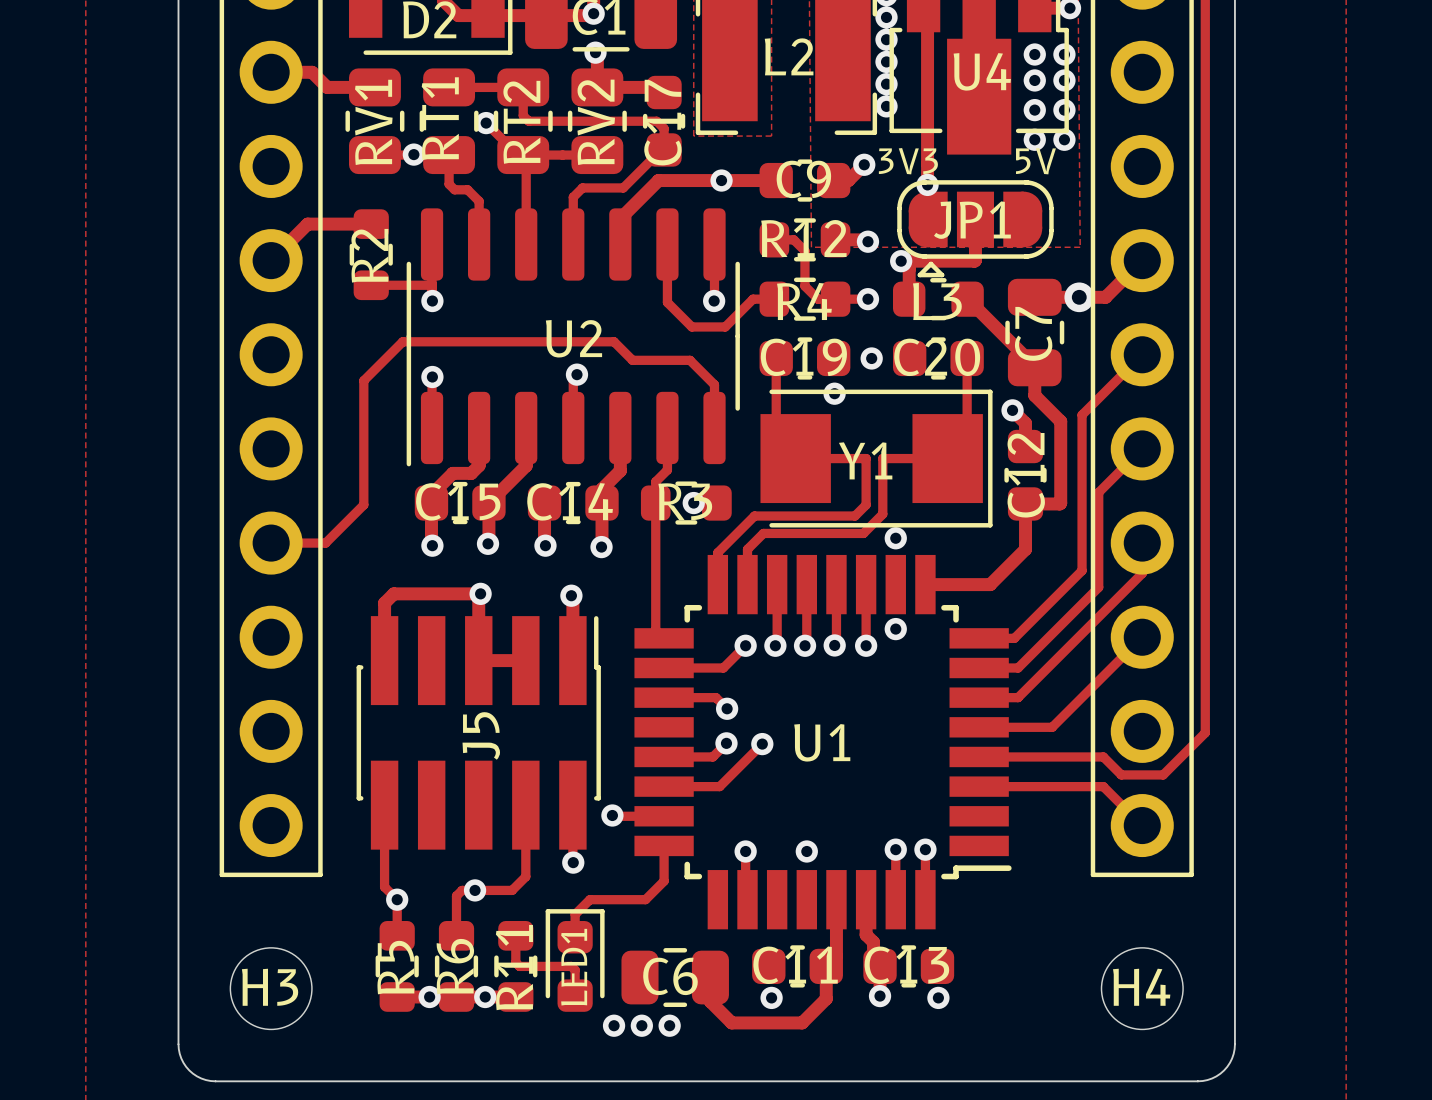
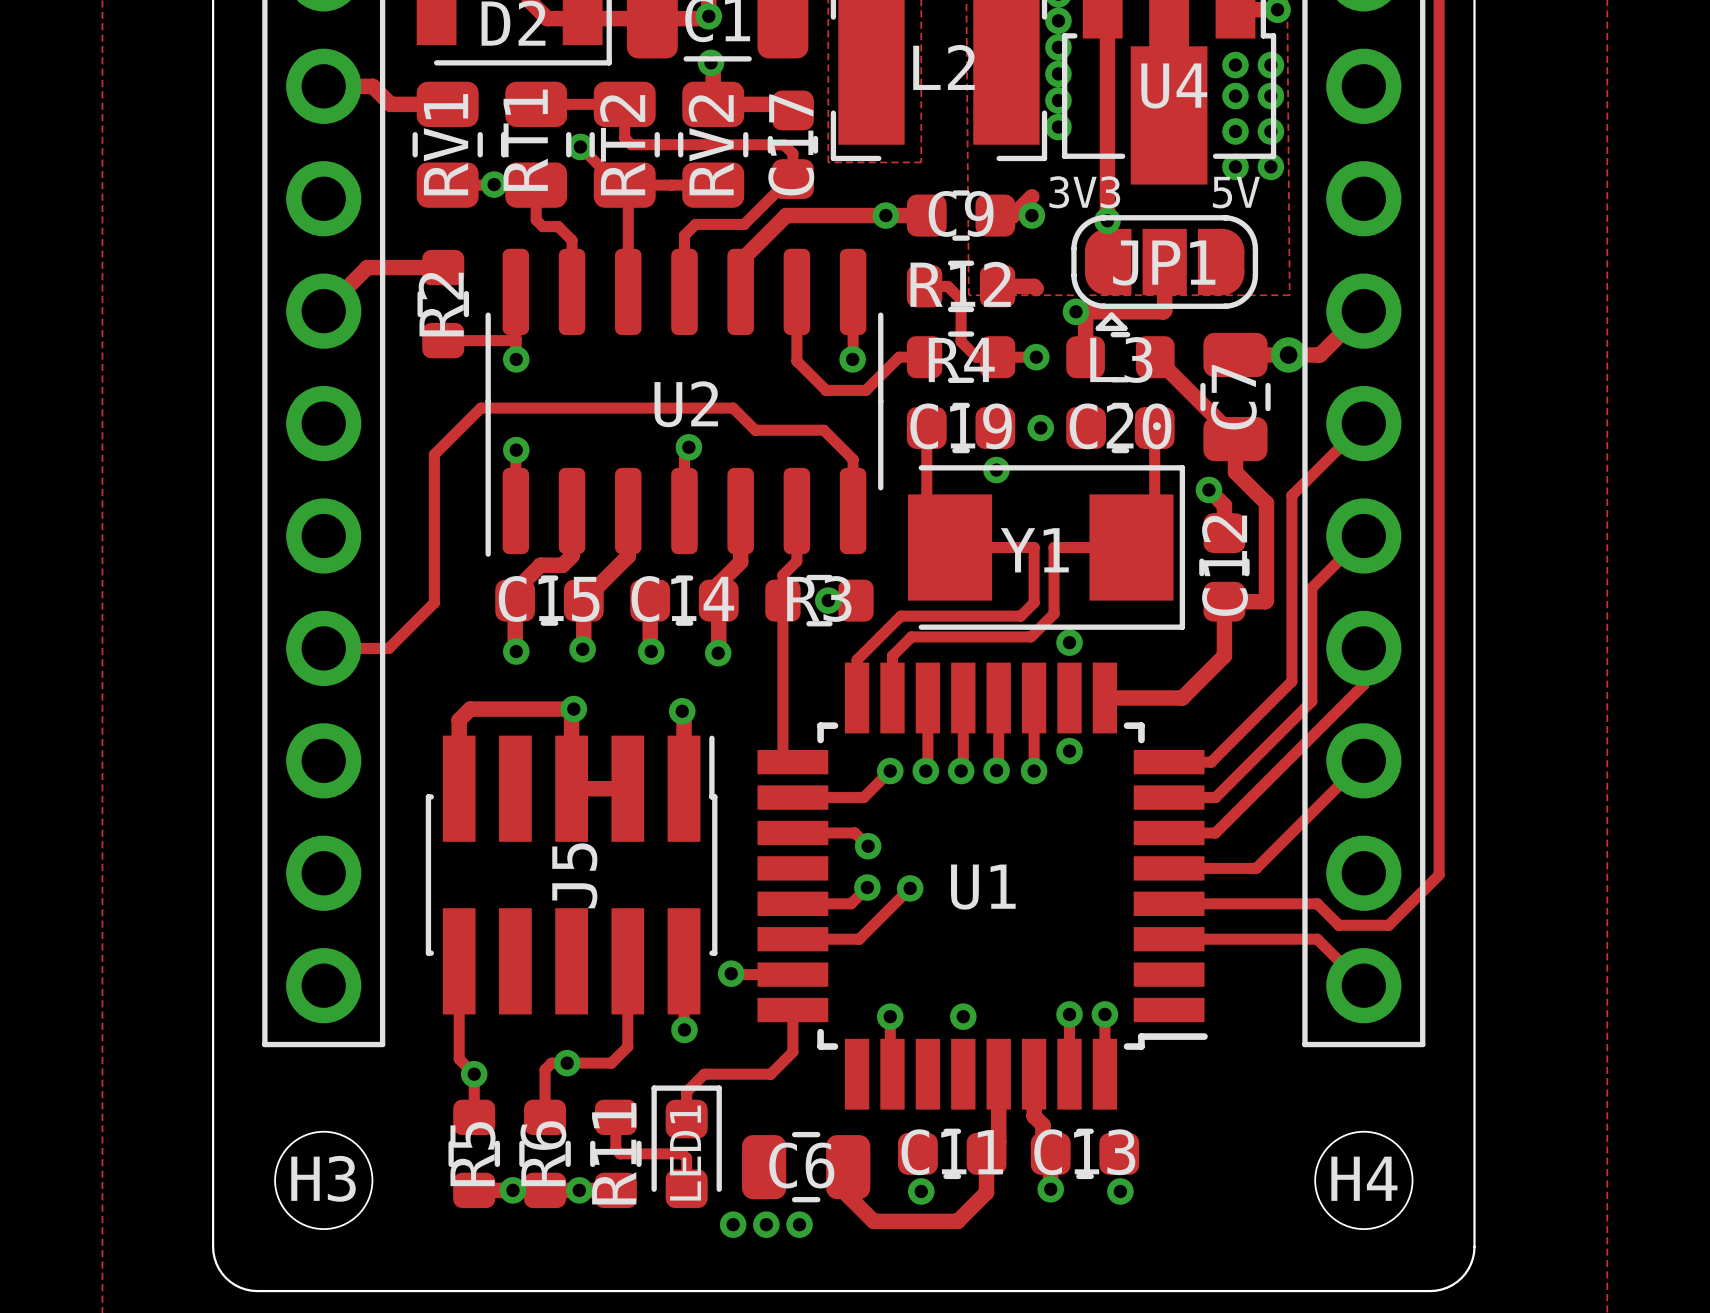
via position: (864, 164) -> (1031, 215)
via position: (721, 180) -> (885, 215)
via: (867, 241) -> none

